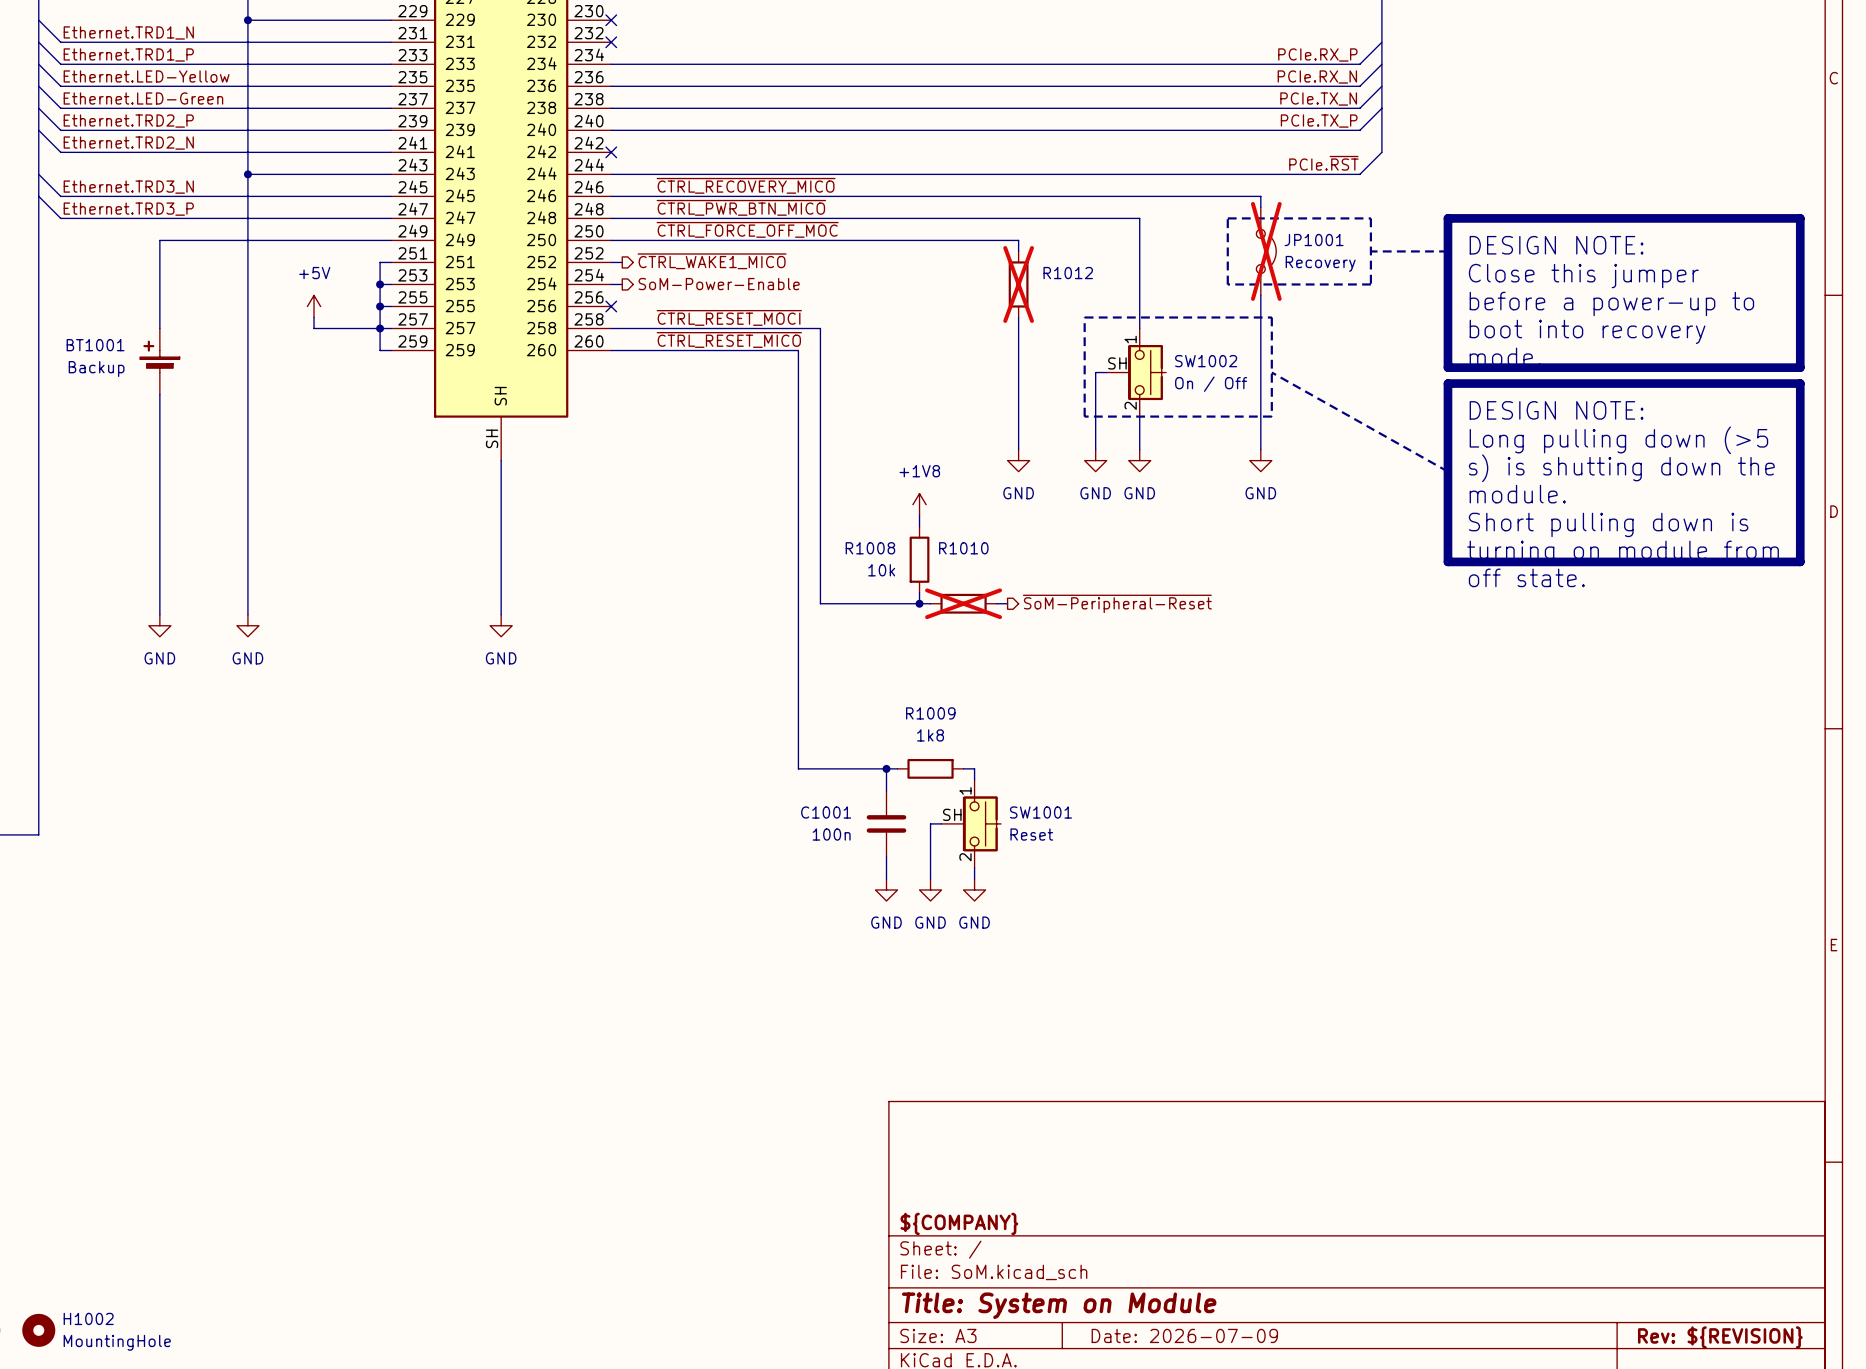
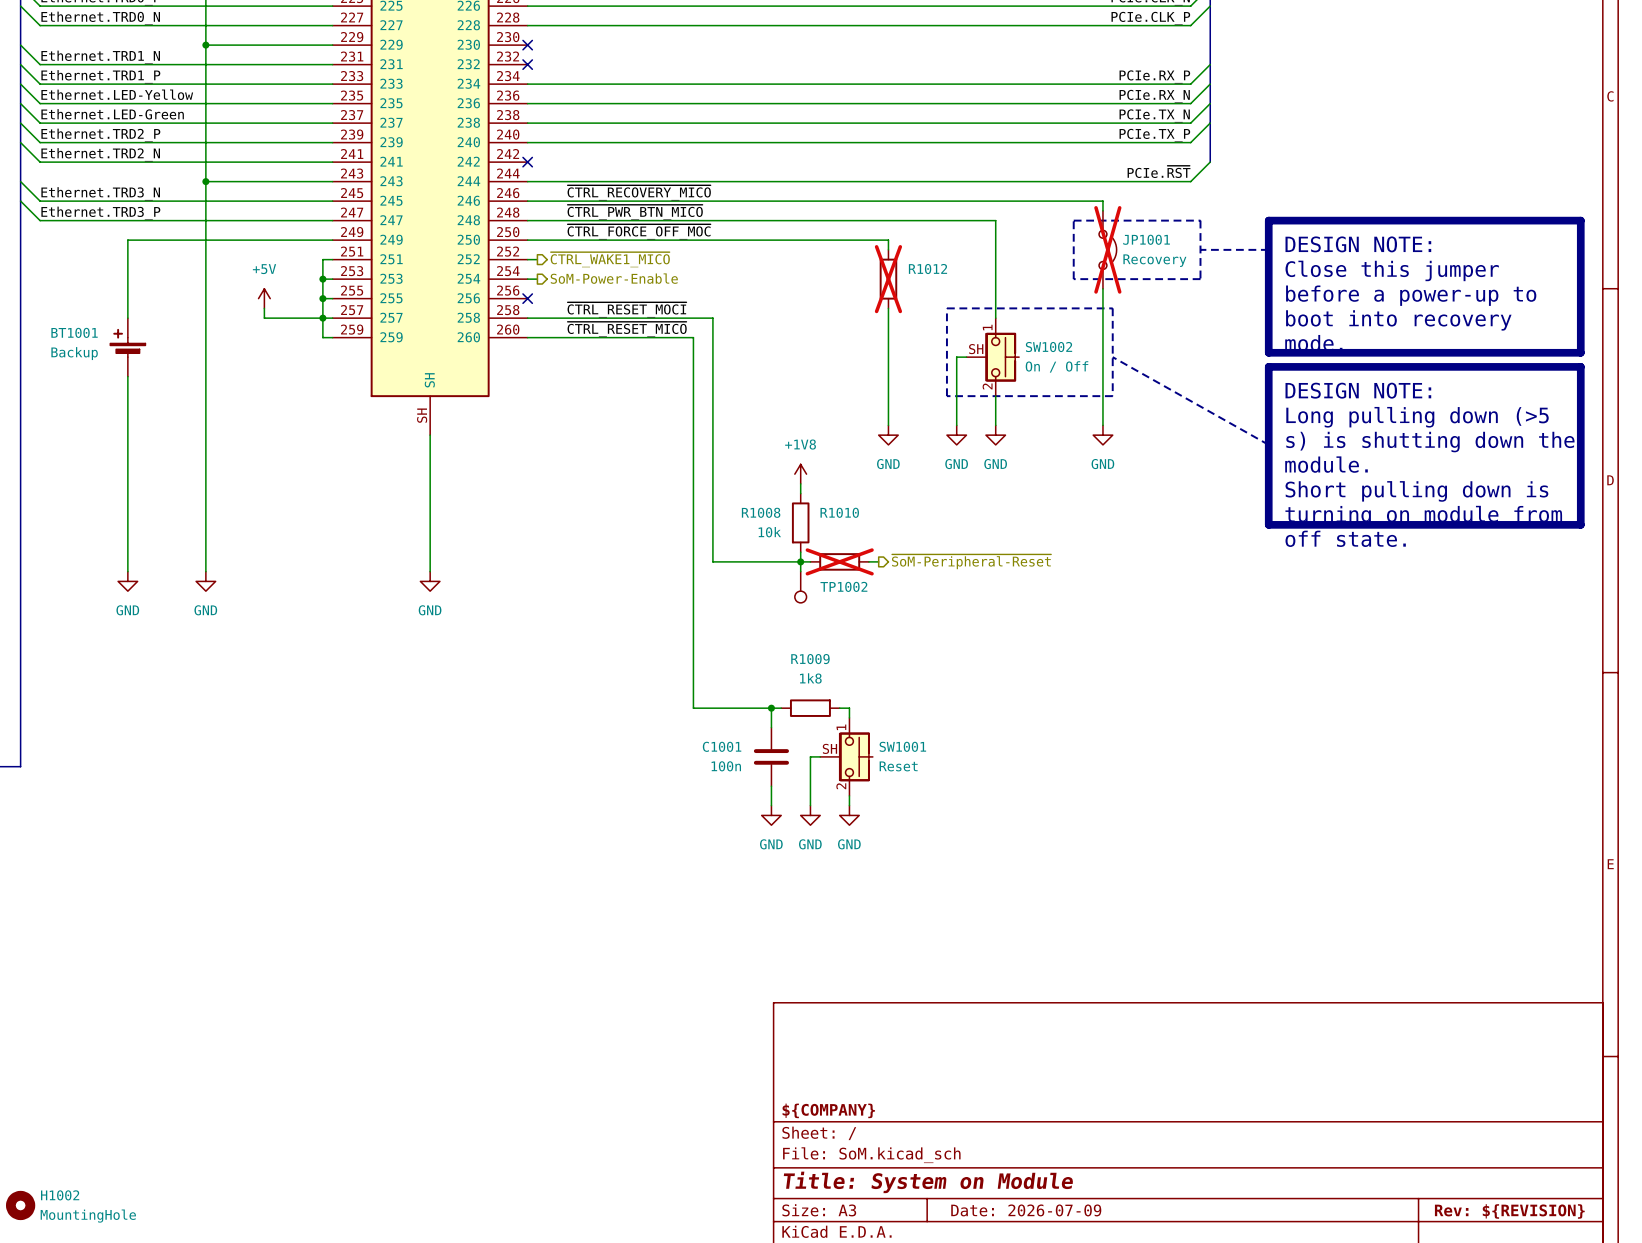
wire: none -> (800, 561) (800, 571)
TP1002: none -> (800, 587)

